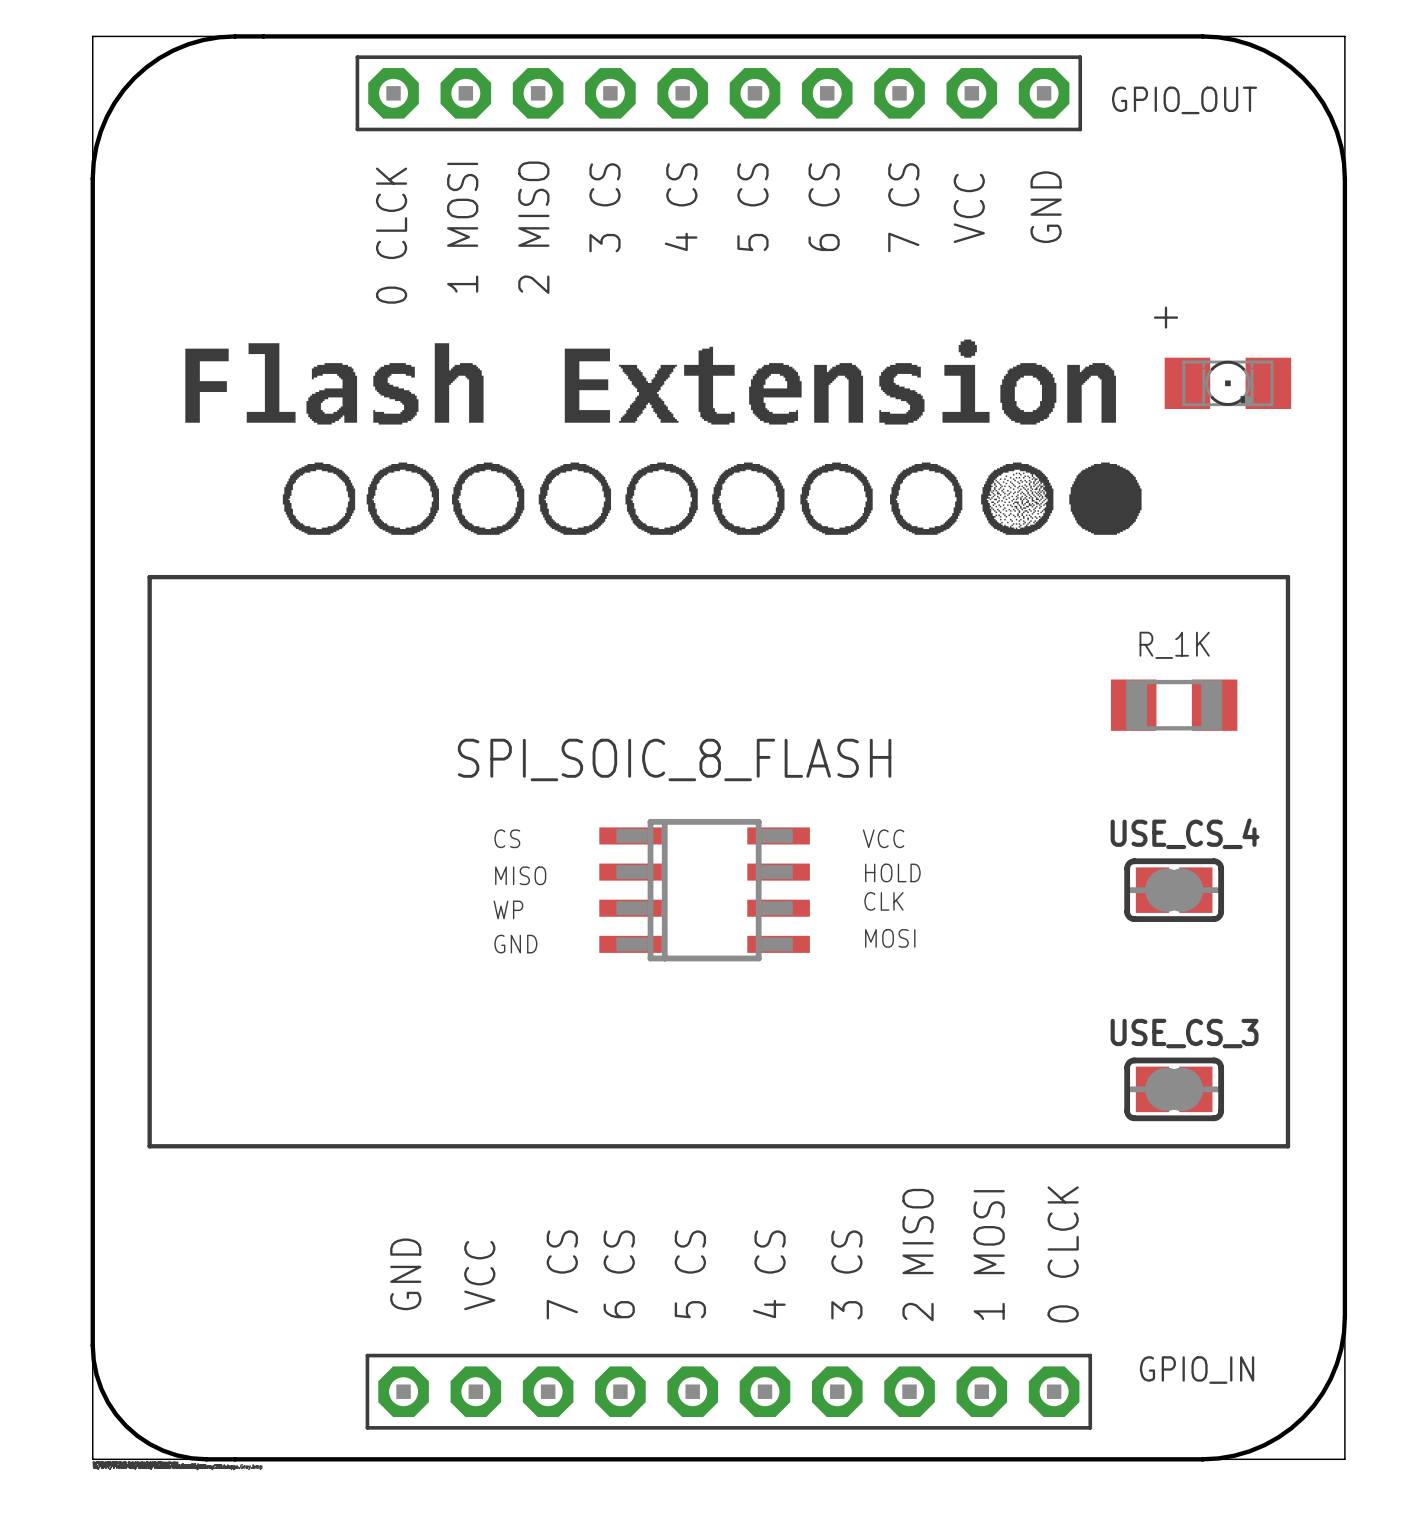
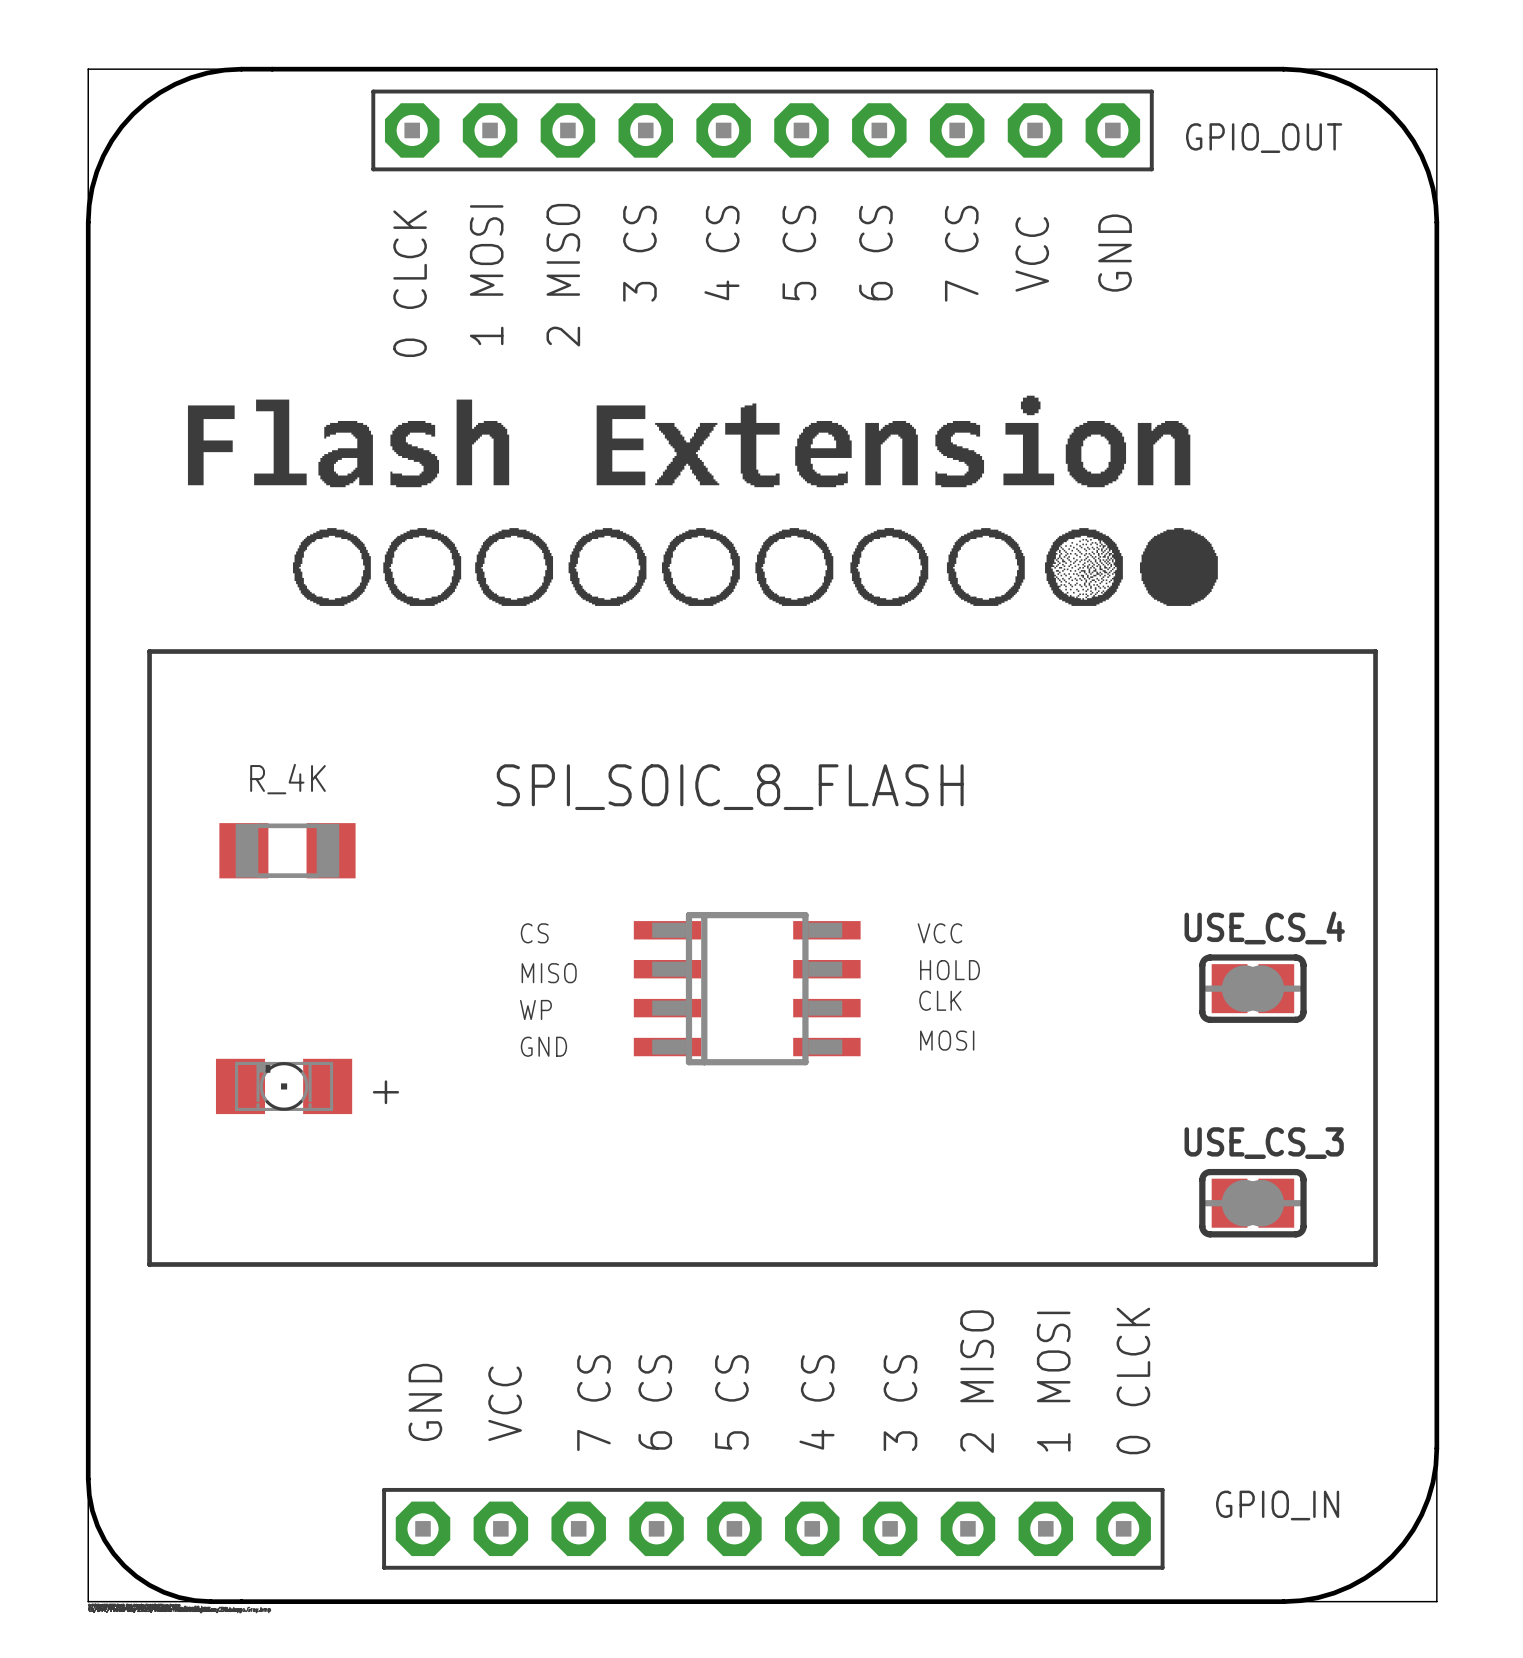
text: + (1165, 317) -> none
part: (1227, 383) -> none
R_1K: (1174, 705) -> none
SPI_SOIC_8_FLASH name position: SPI_SOIC_8_FLASH (674, 759) -> SPI_SOIC_8_FLASH (730, 787)
R_4K: none -> (287, 850)
part: none -> (284, 1086)
text: none -> + (385, 1092)

